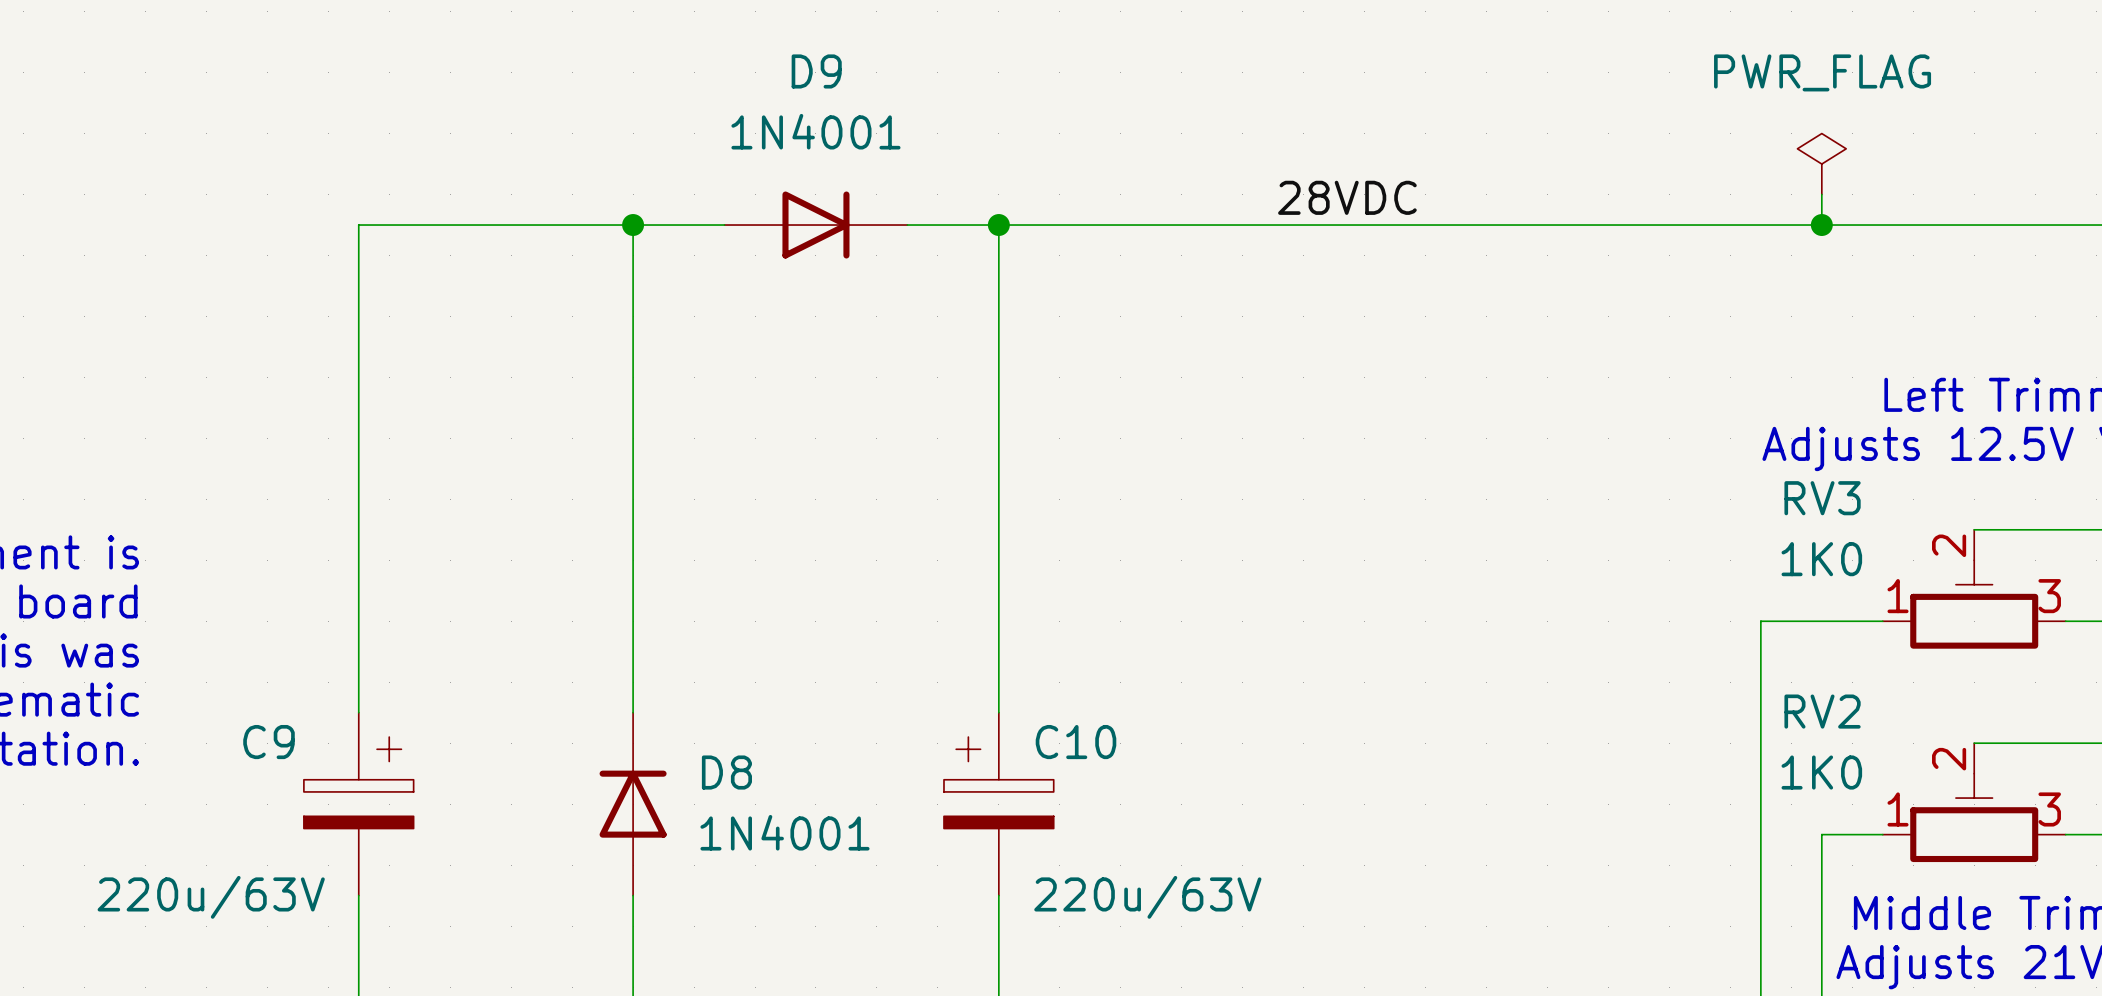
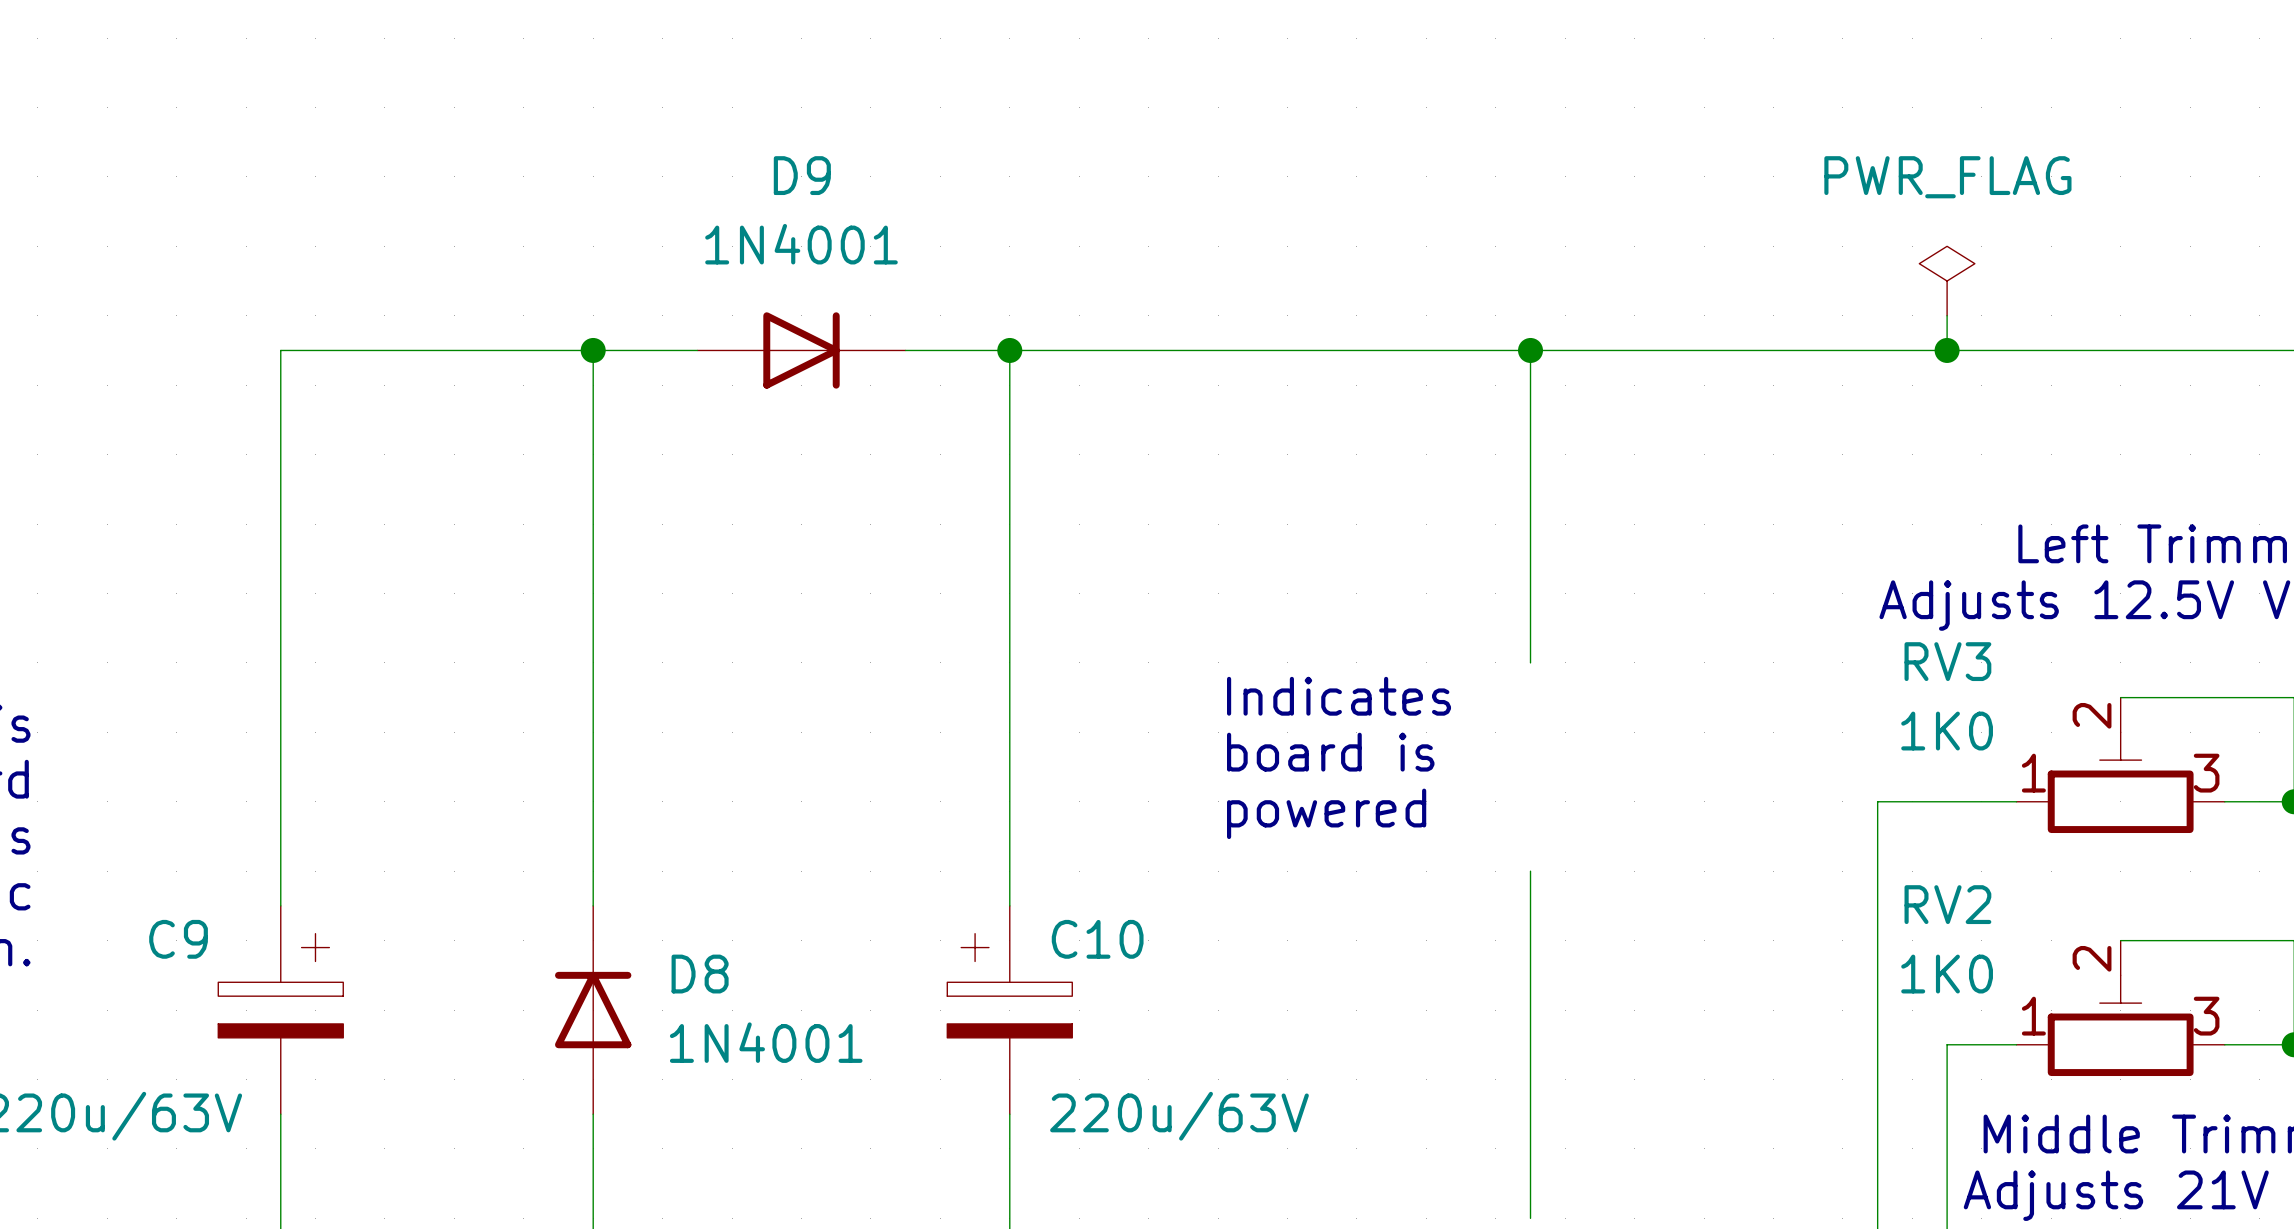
label: 28VDC (1347, 197) -> none
wire: none -> (1530, 350) (1530, 662)
junction: none -> (1530, 350)
text: none -> Indicates (1339, 696)
text: none -> board is (1330, 752)
text: none -> powered (1326, 813)
wire: none -> (1530, 871) (1530, 1218)

